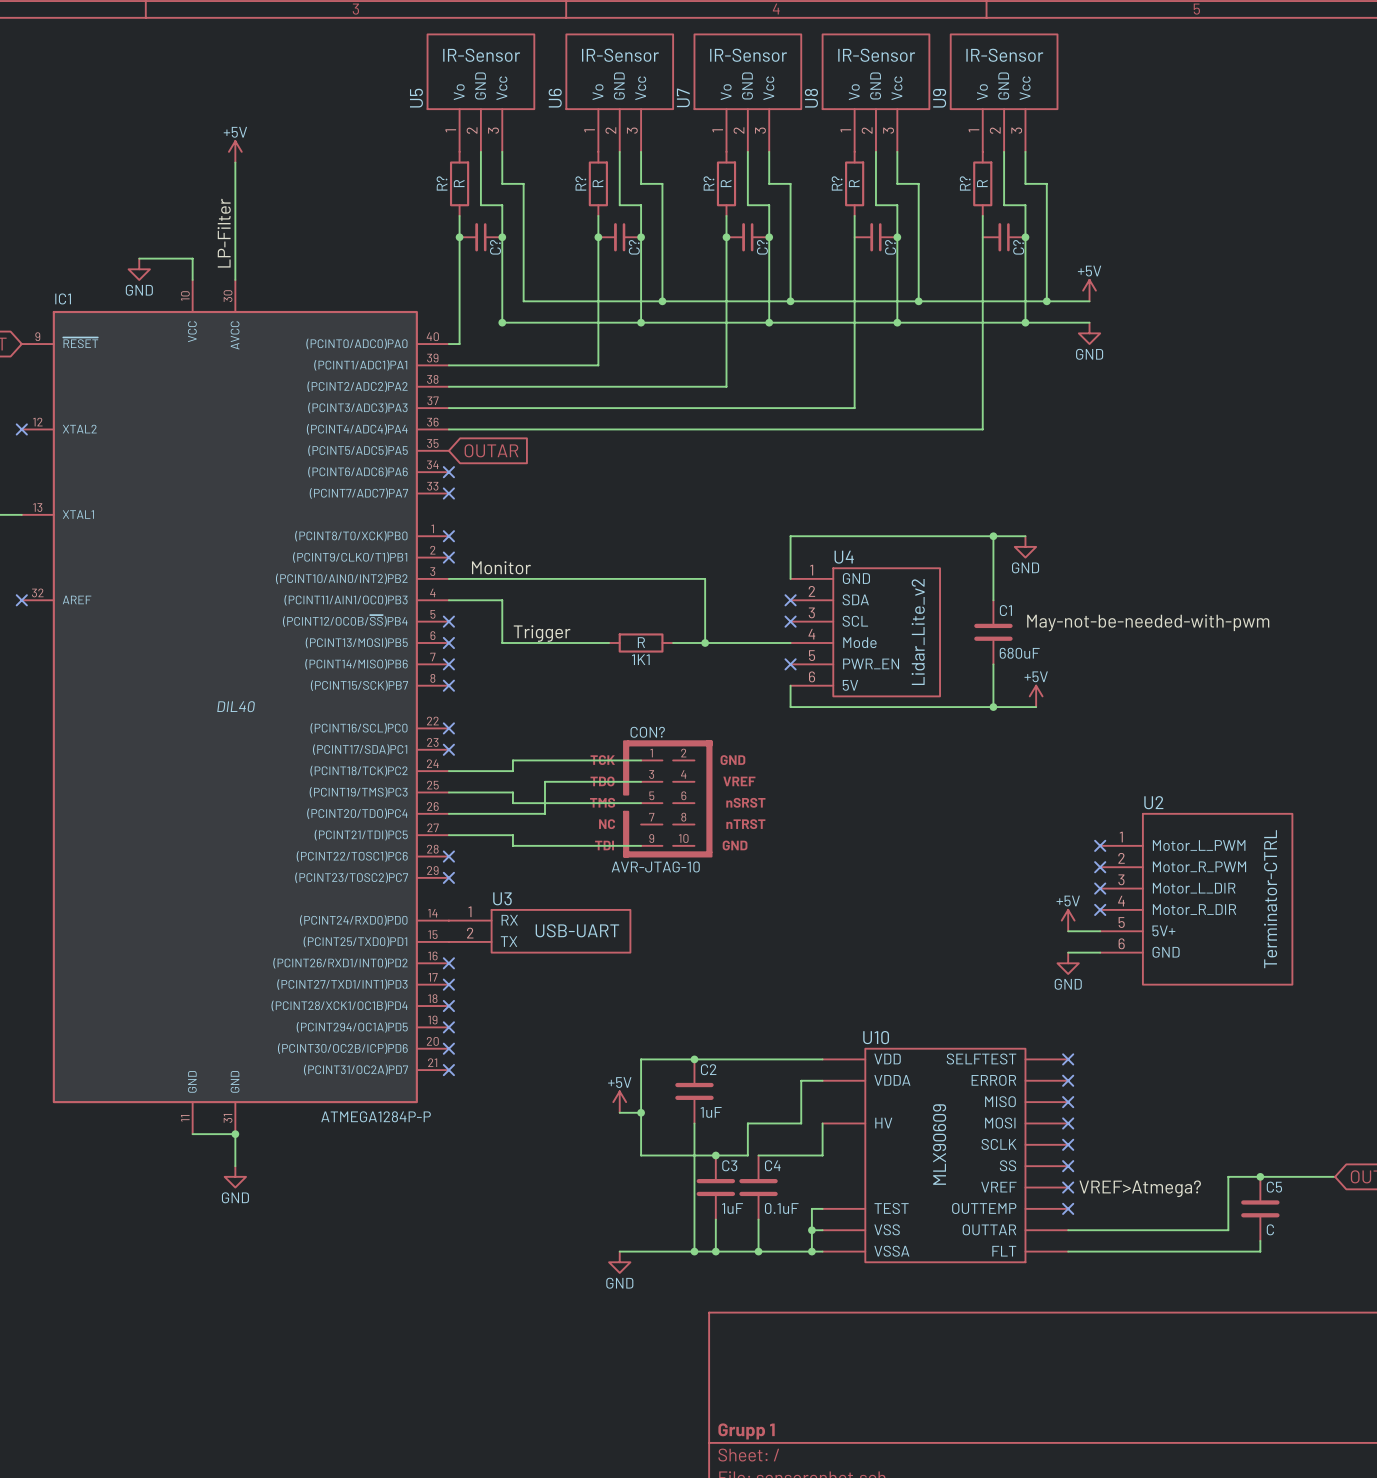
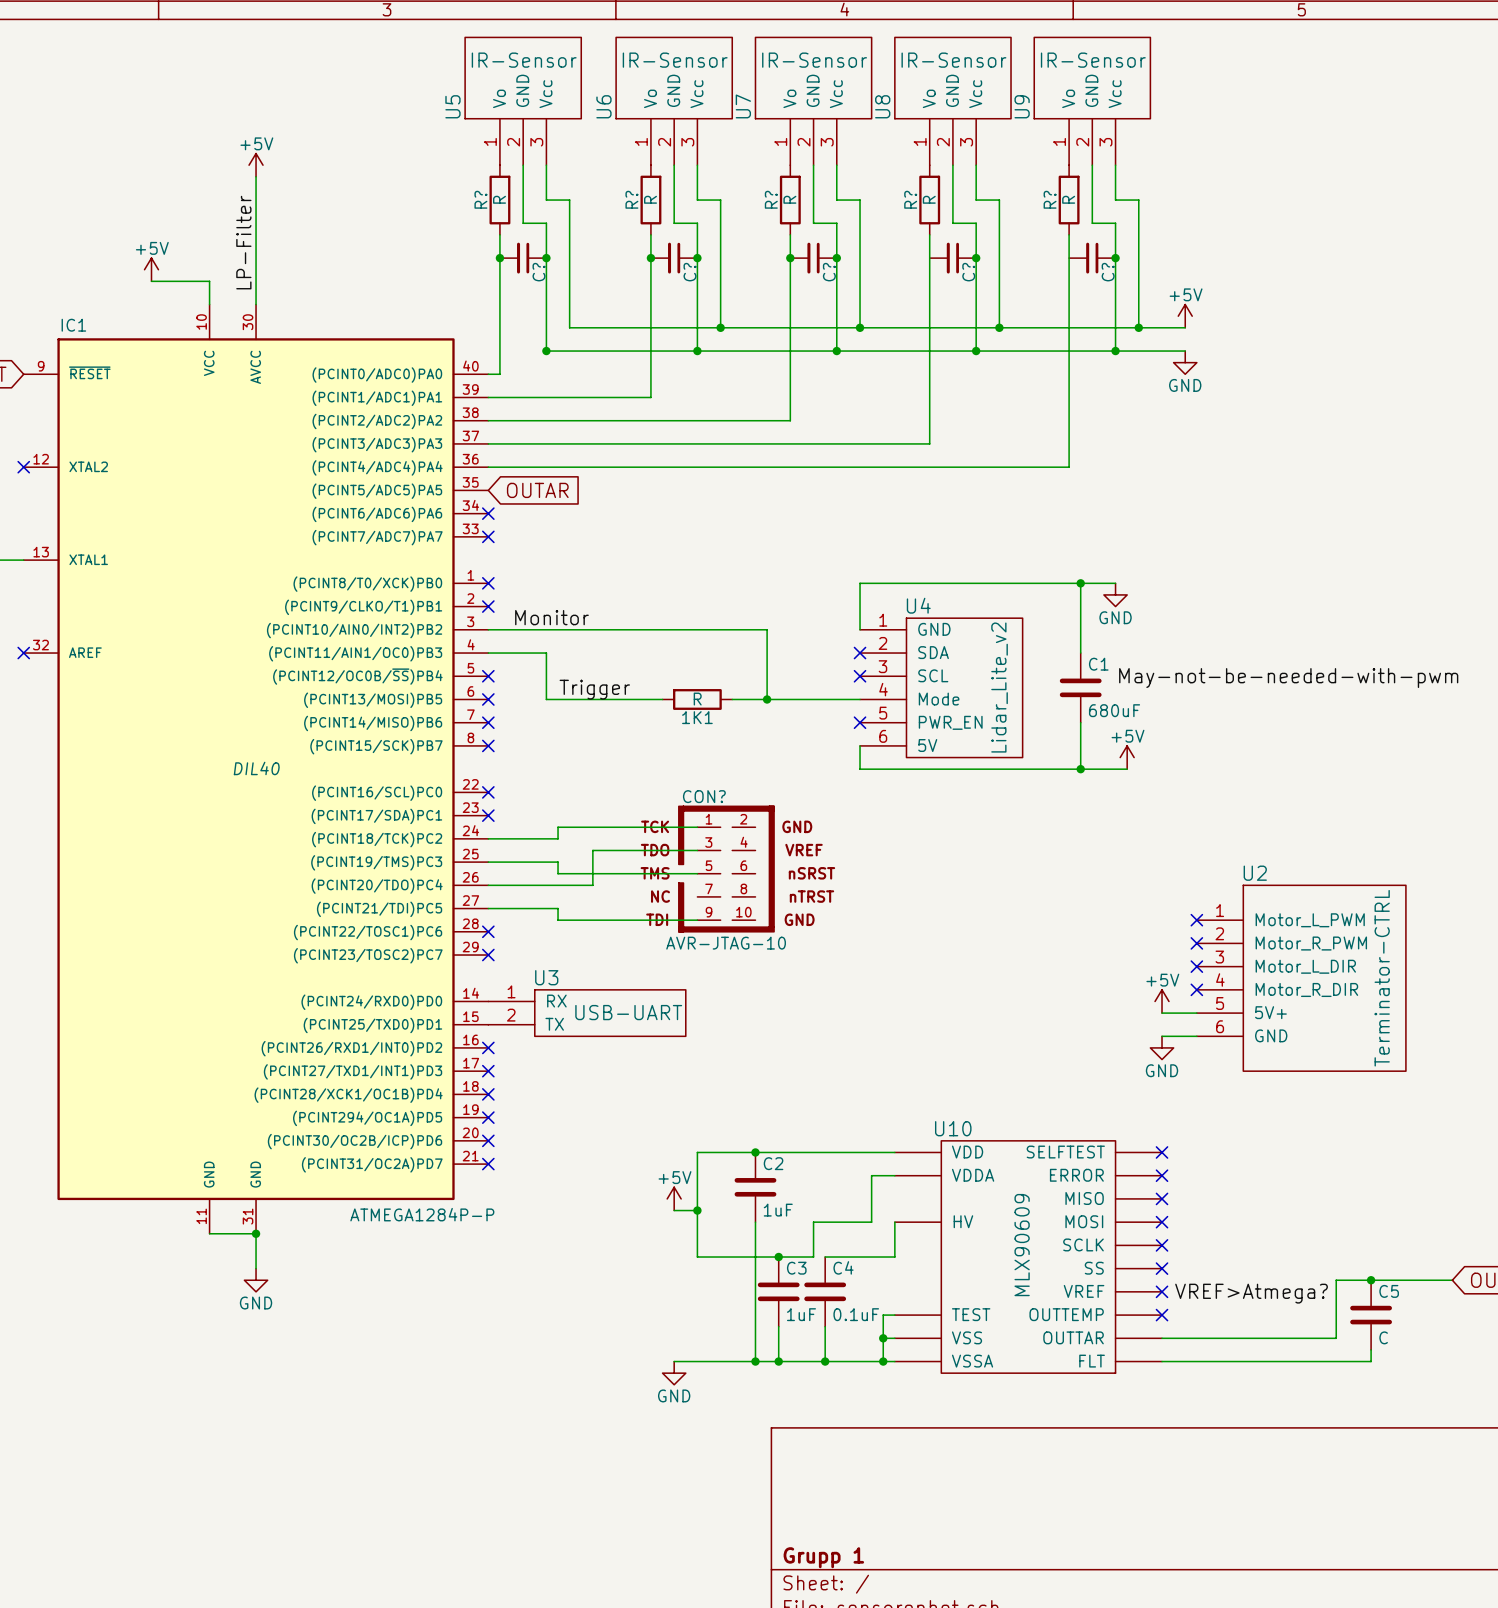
power symbol: none -> +5V (151, 269)
power symbol: GND (139, 269) -> none

